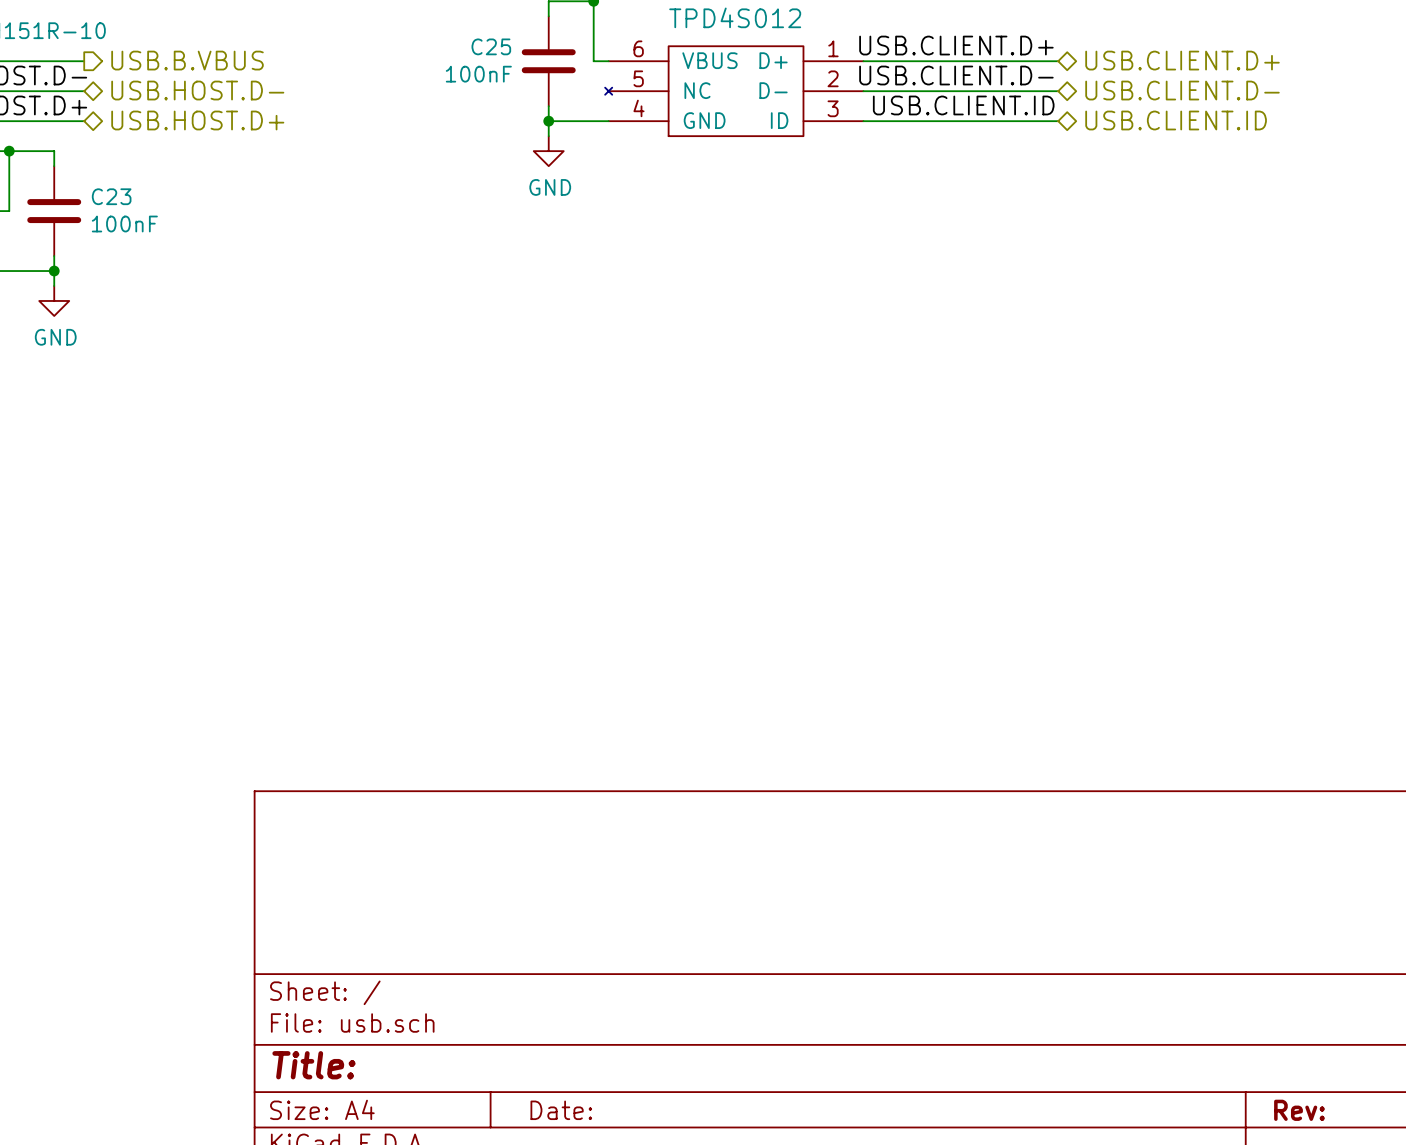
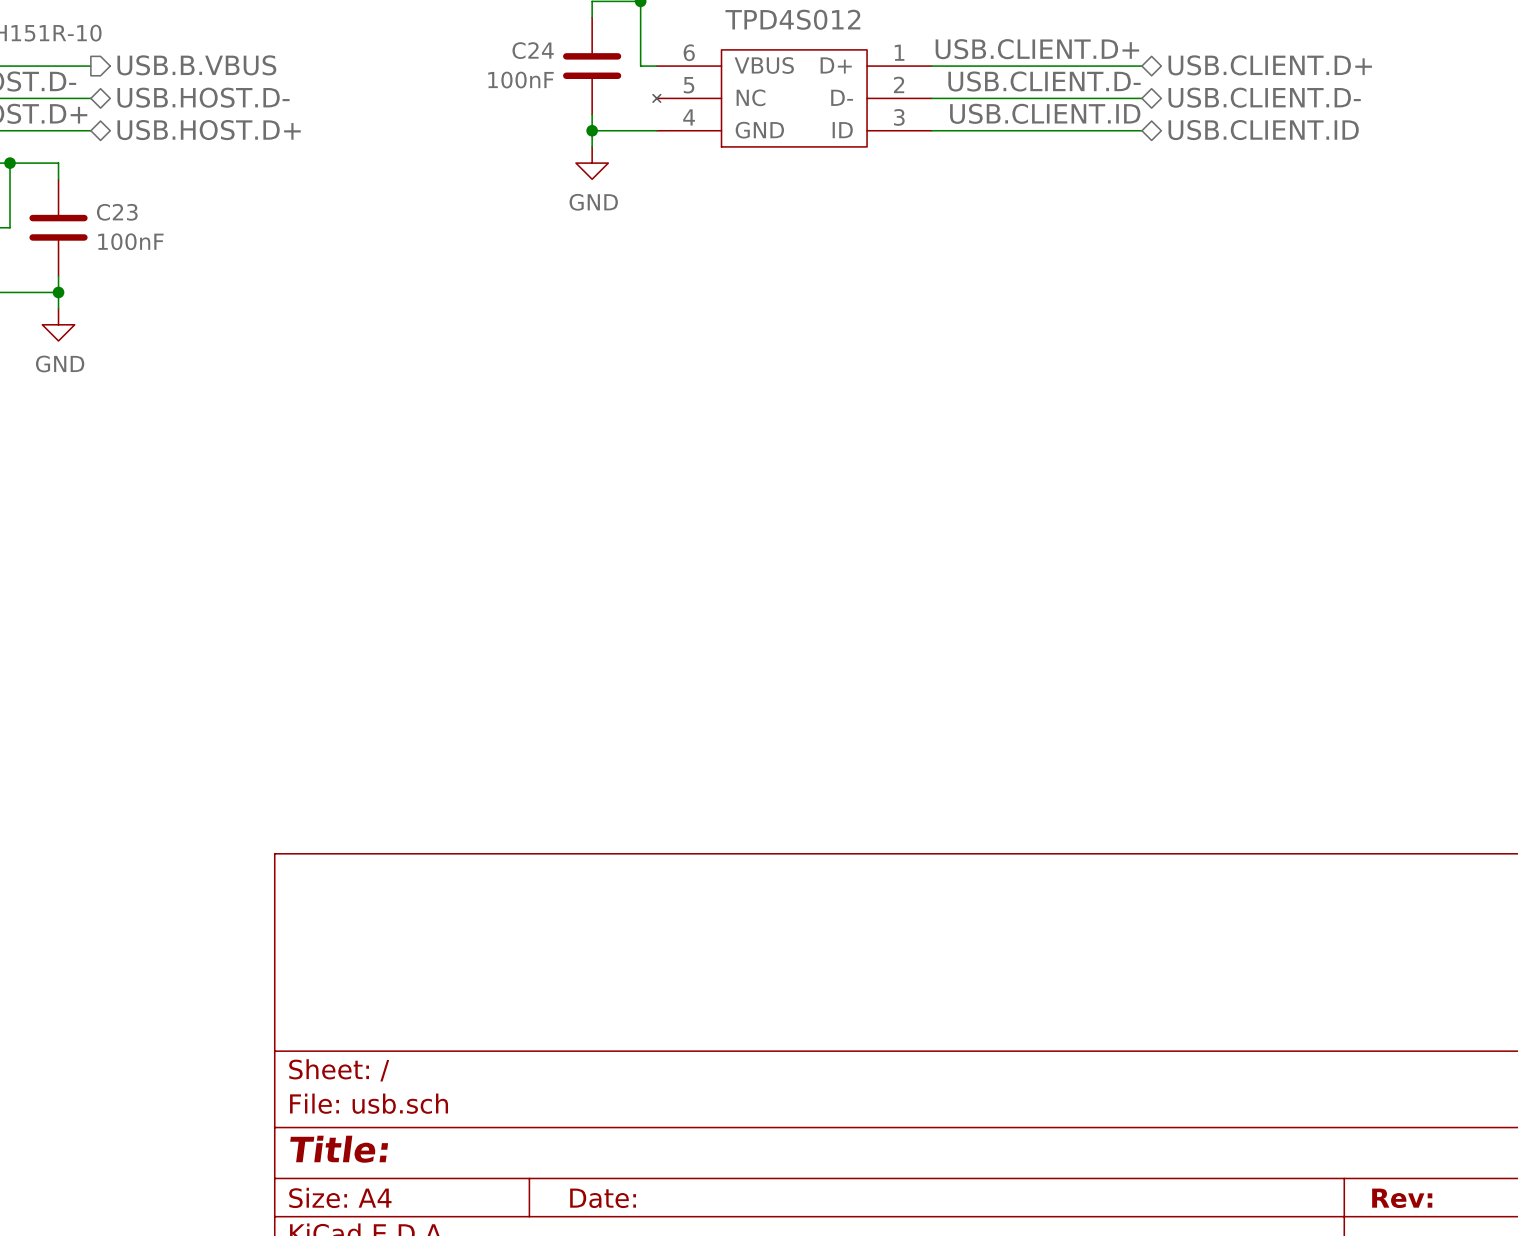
C25 name: C25 (491, 46) -> C24 (533, 50)

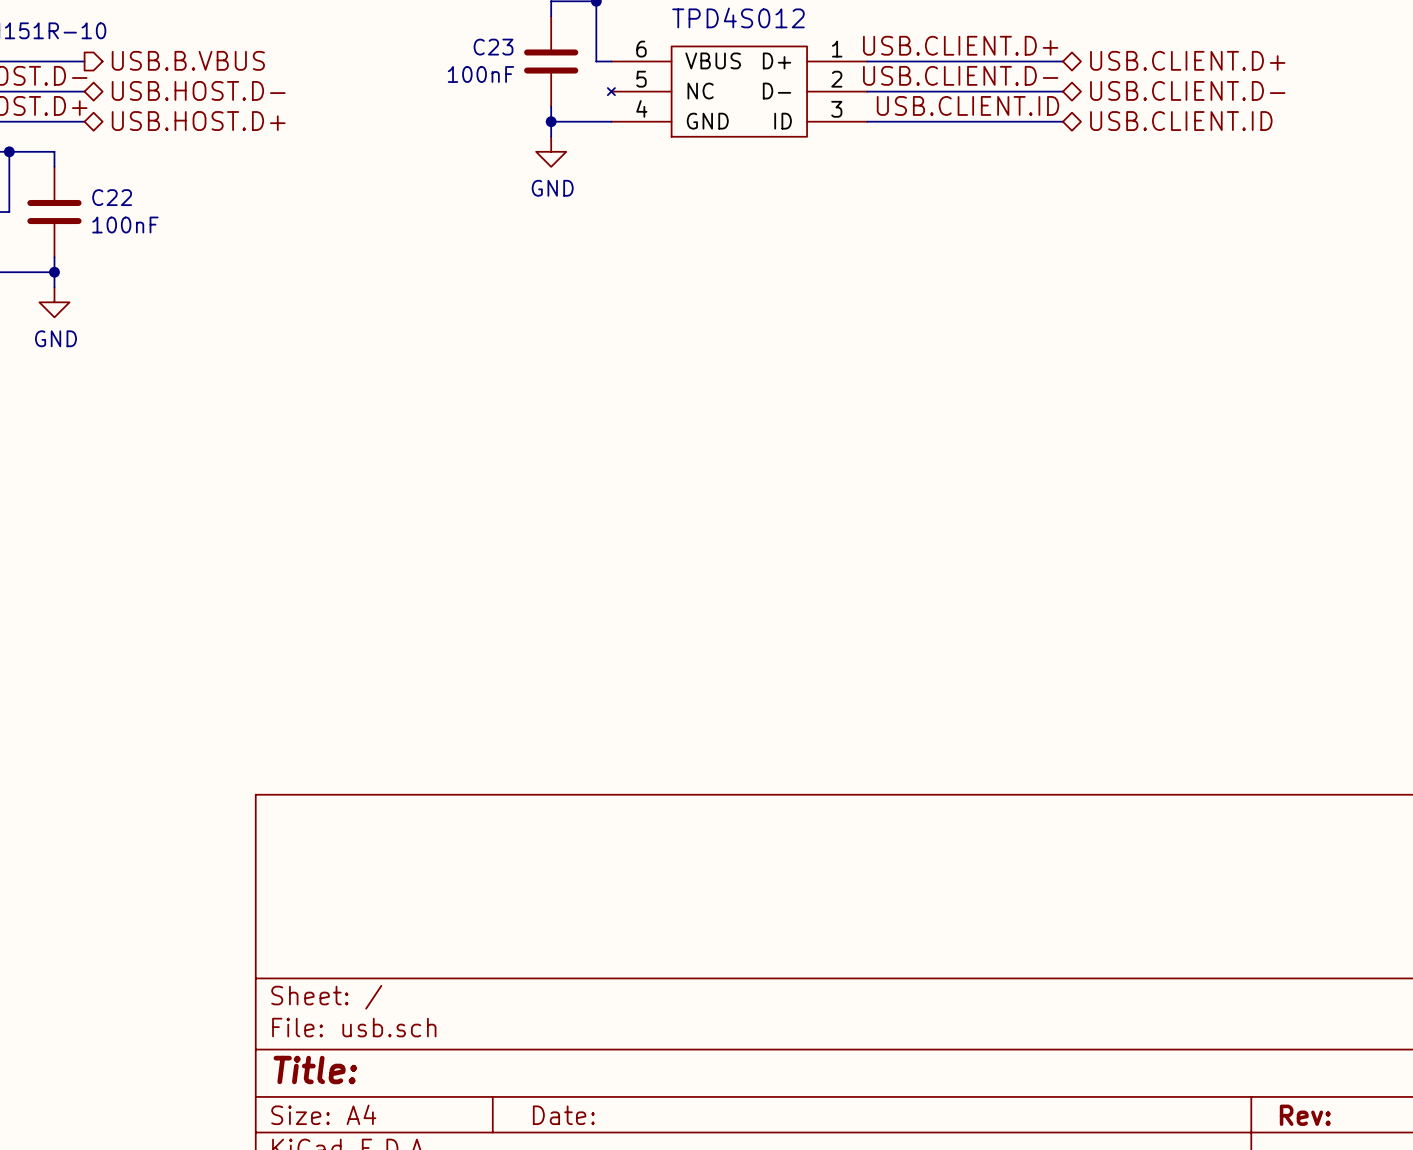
C24 name: C24 (533, 50) -> C23 (493, 47)
C23 name: C23 (117, 212) -> C22 (112, 197)

